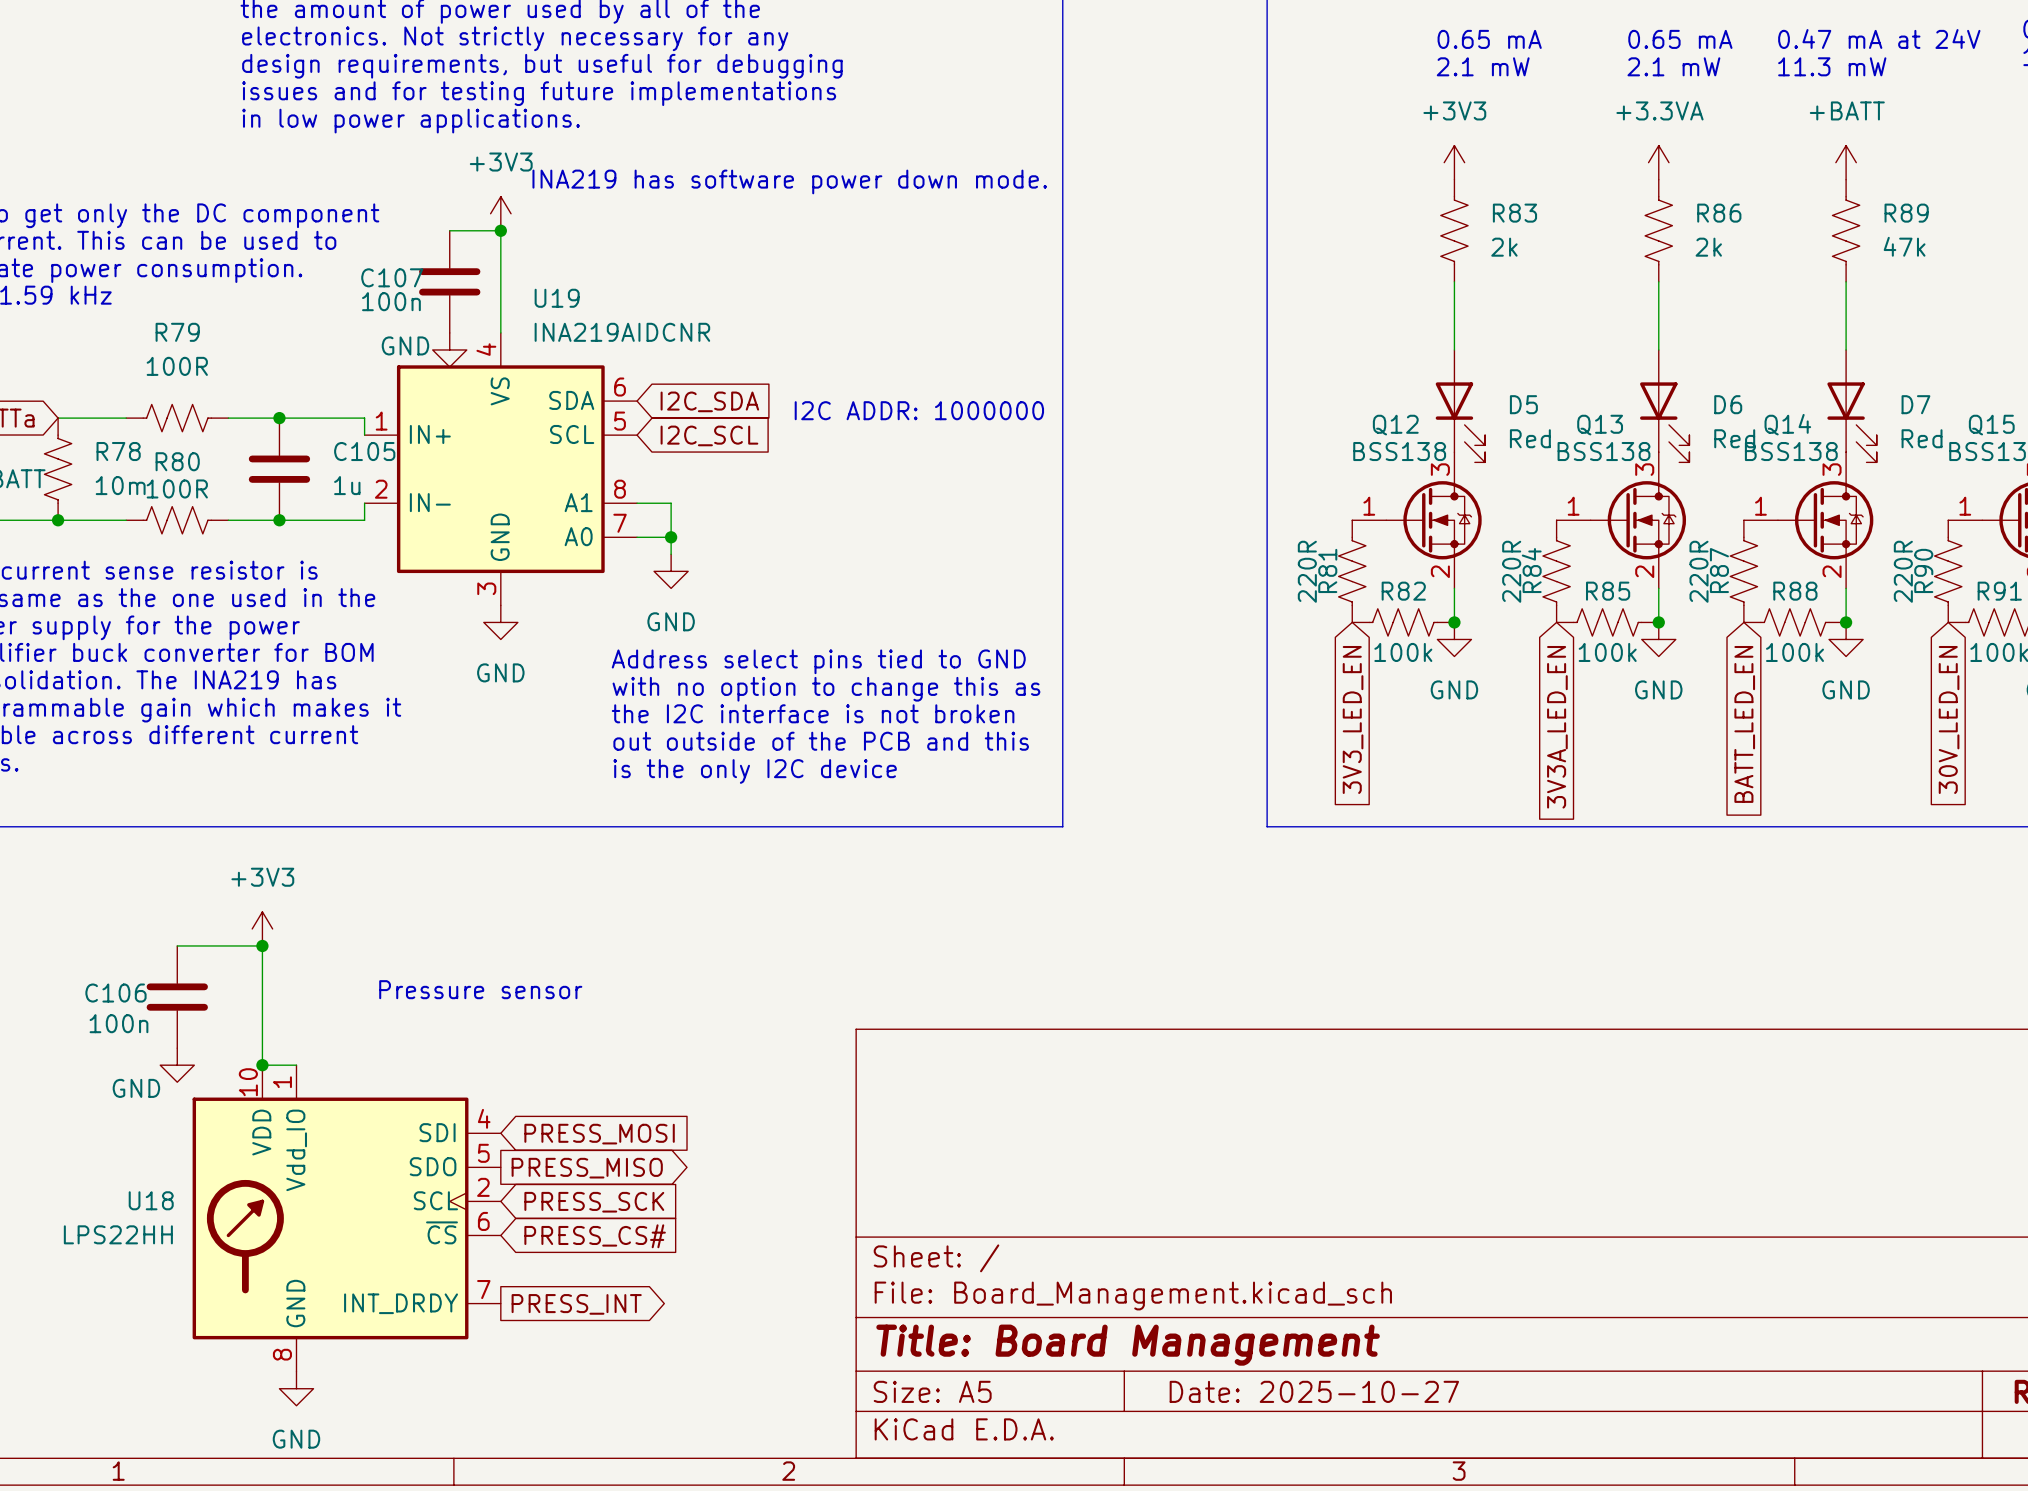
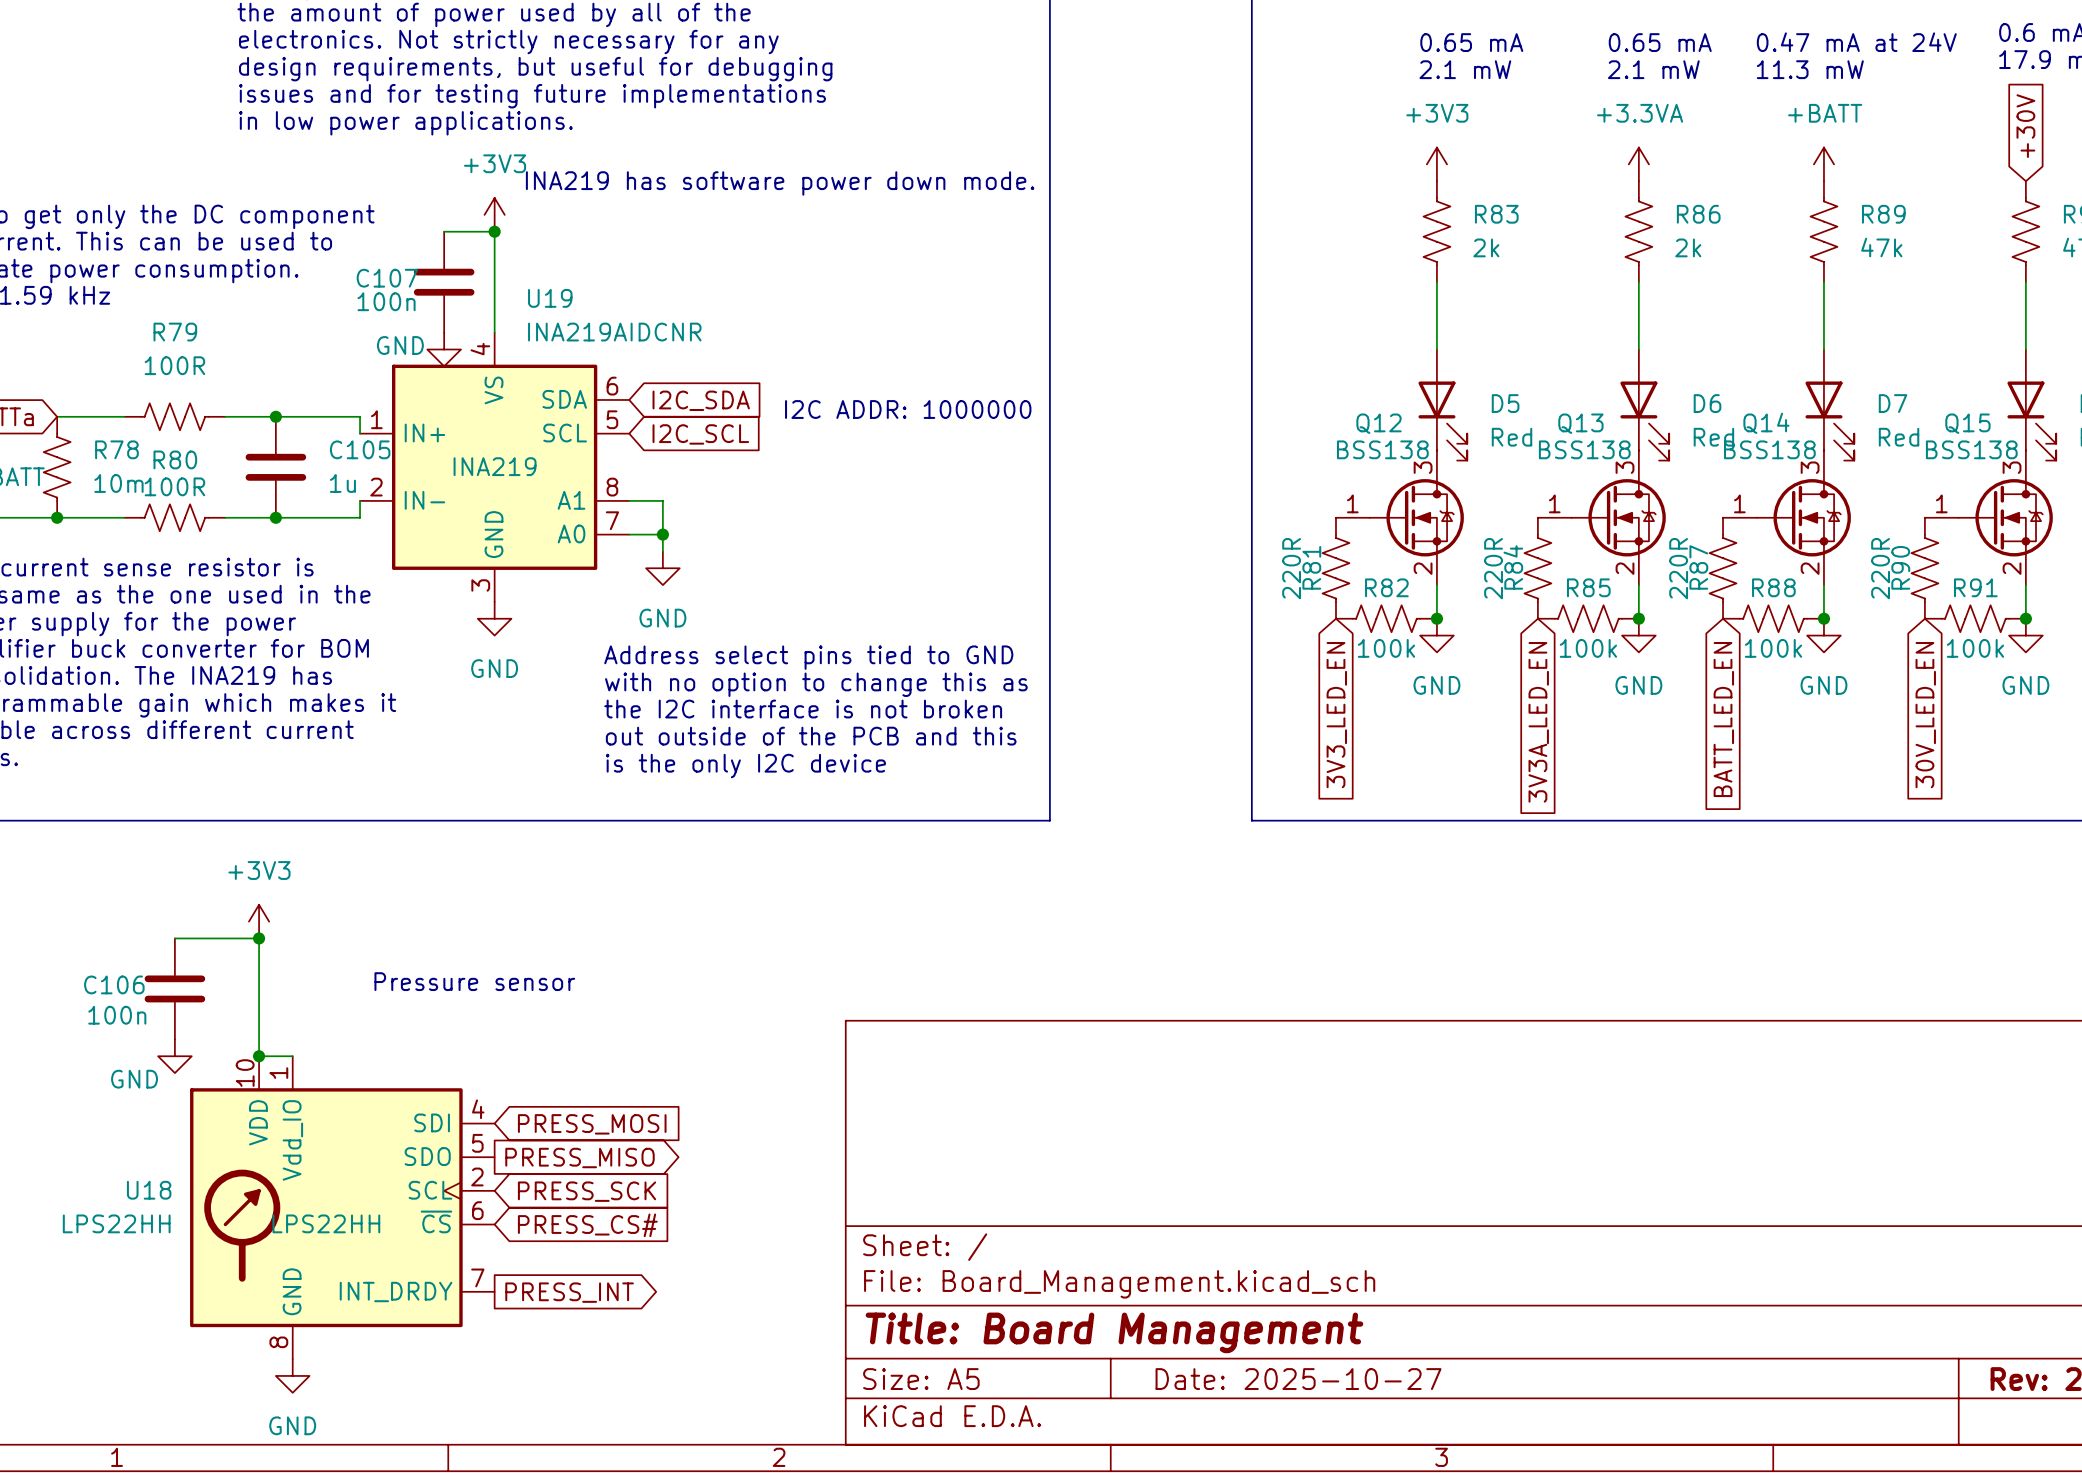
U19 text: none -> INA219 (495, 466)
U18 text: none -> LPS22HH (326, 1223)

